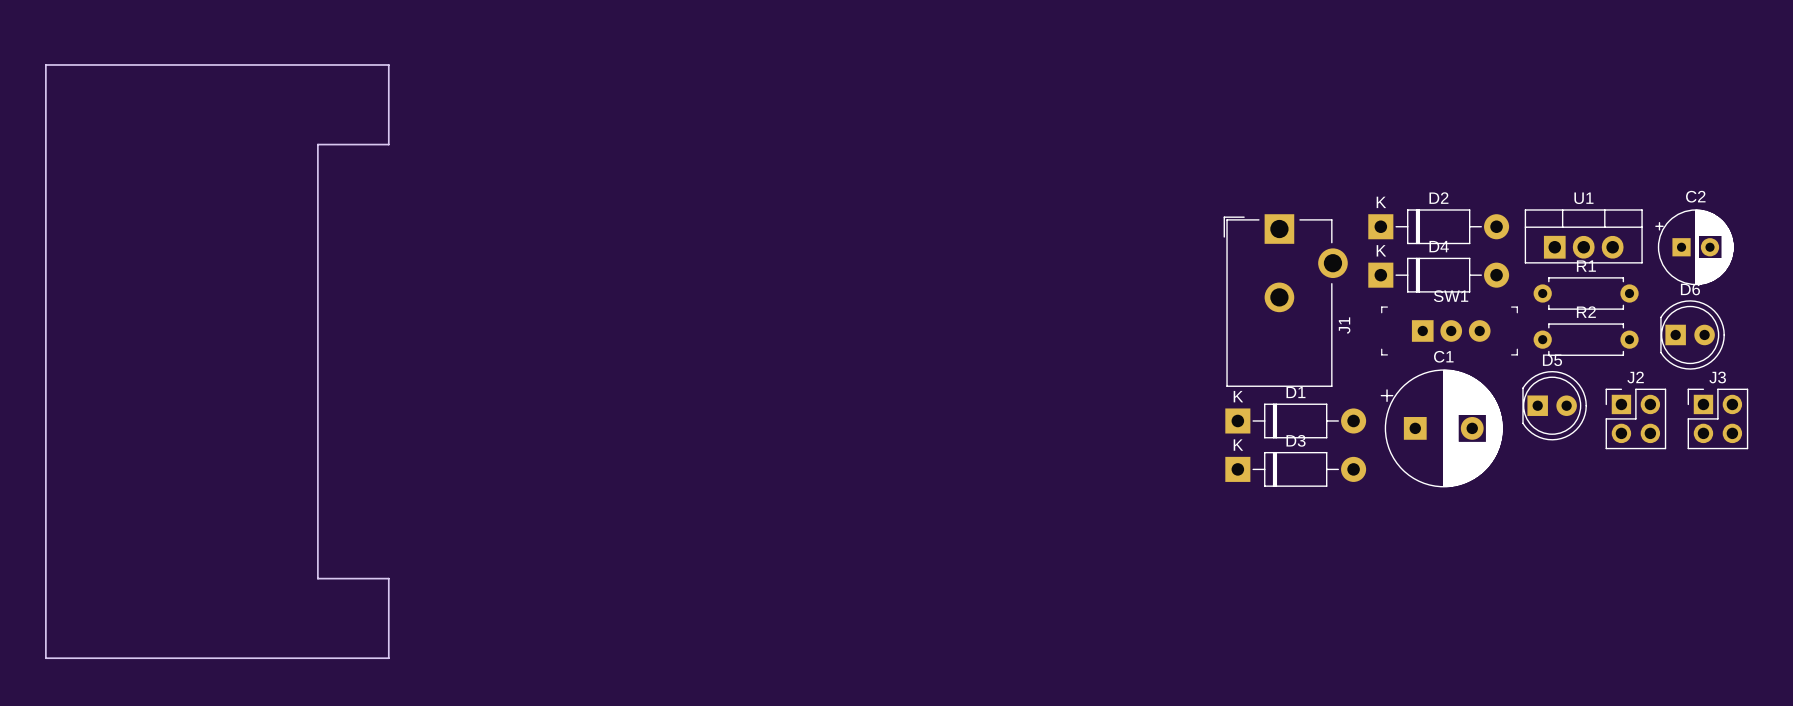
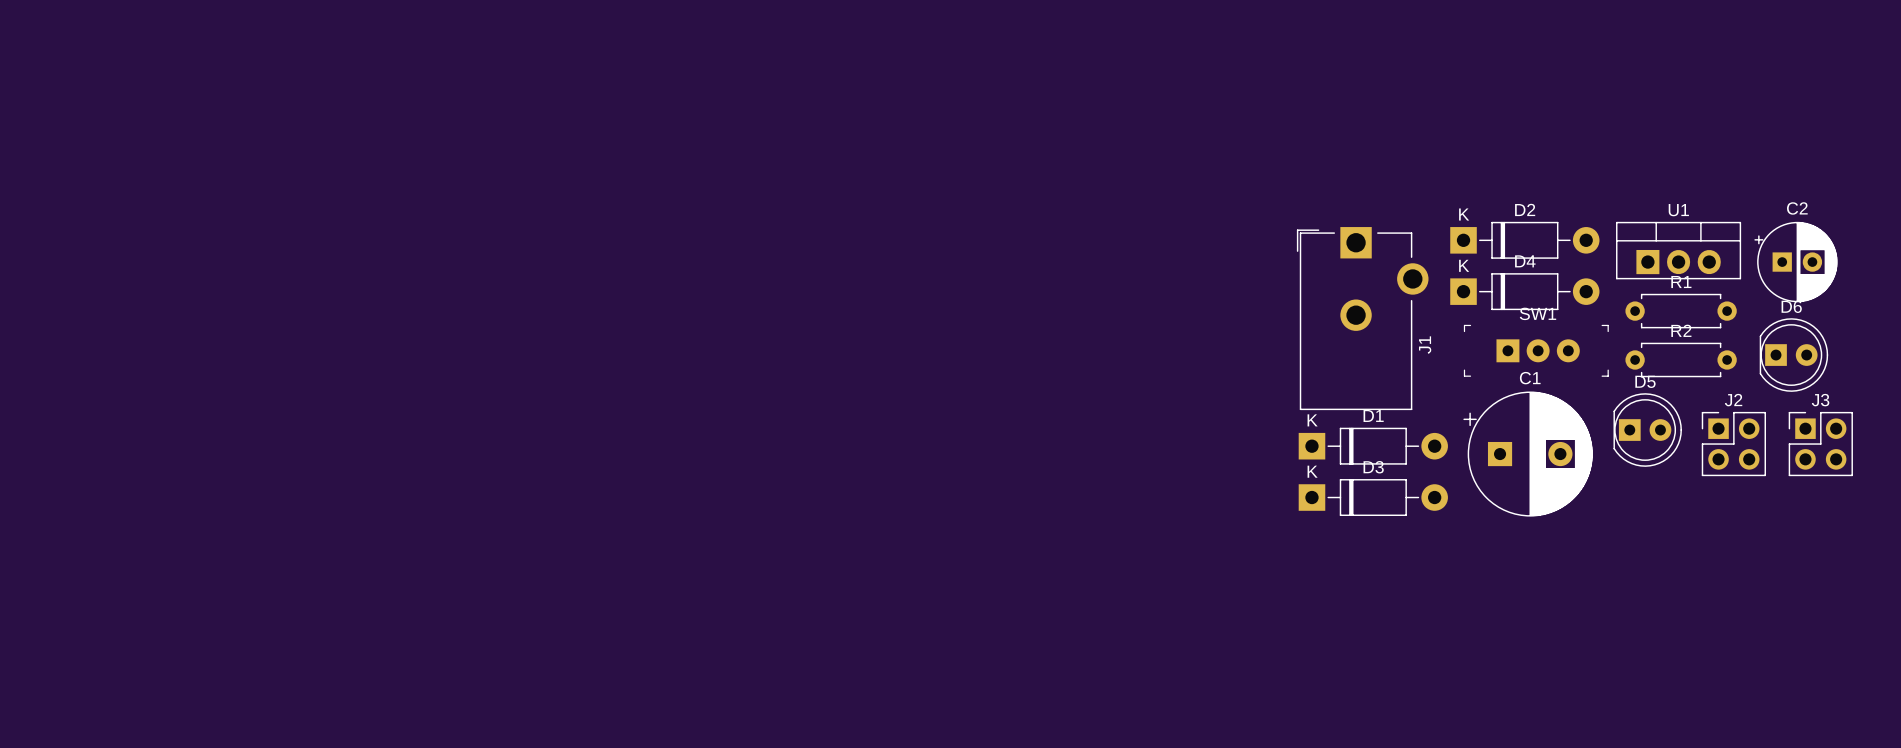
board edge: (45, 64) (388, 64) (388, 144) (317, 144) (317, 578) (388, 578) (388, 658) (45, 658) (45, 64) -> none

